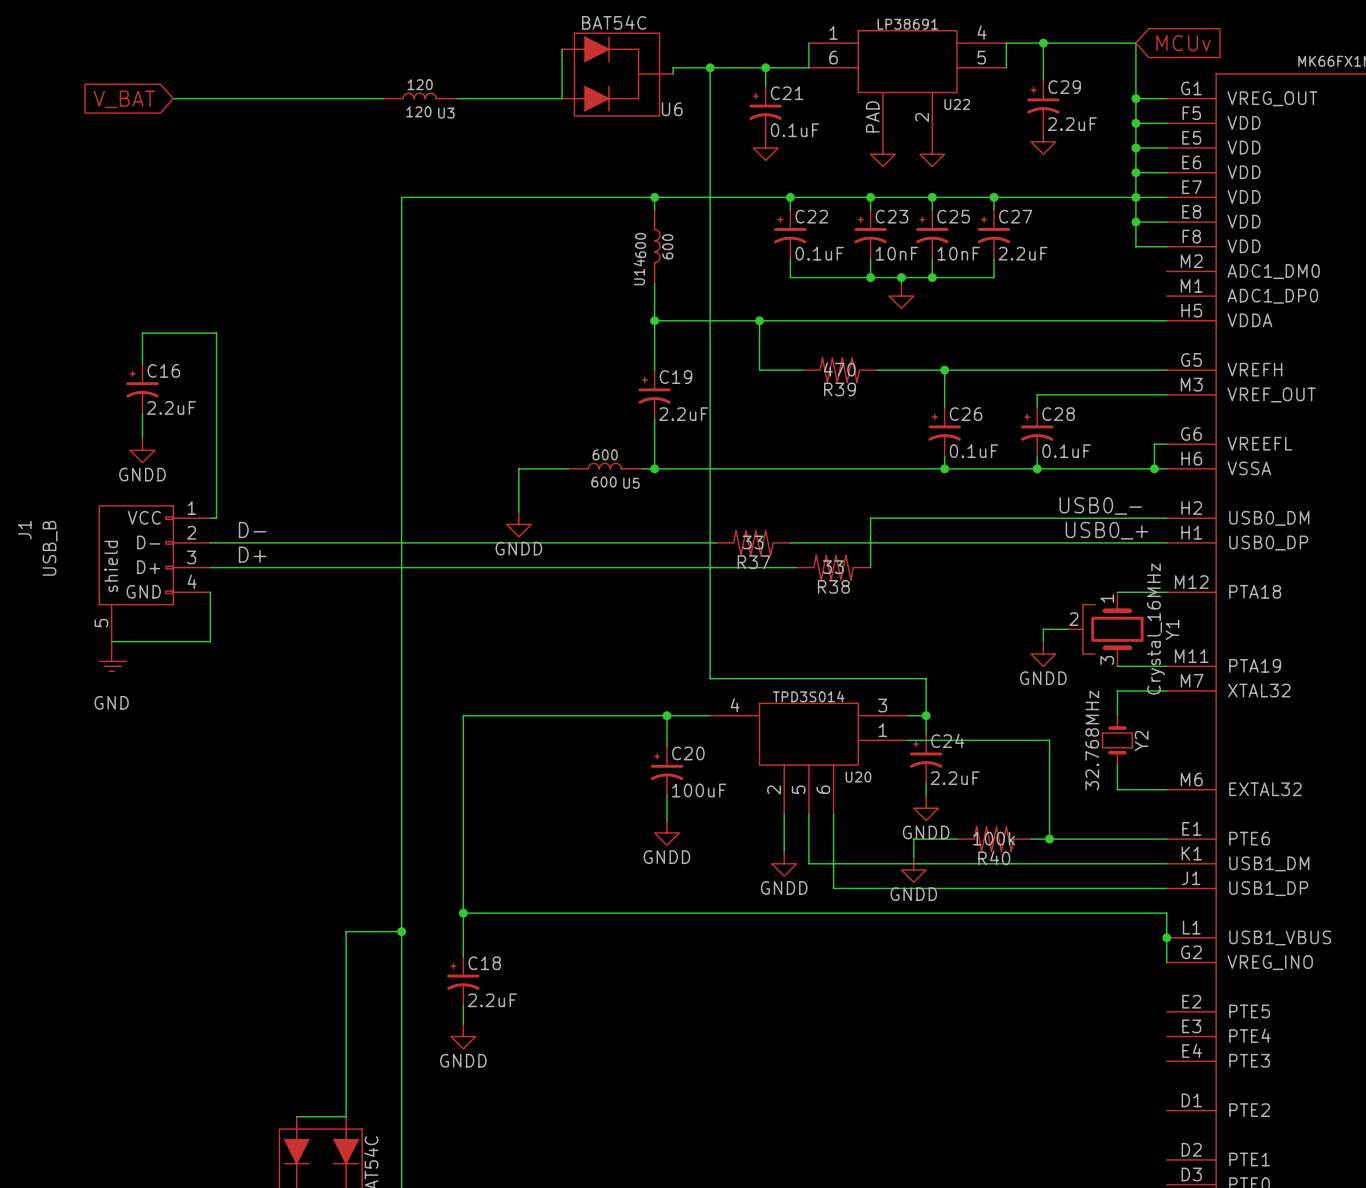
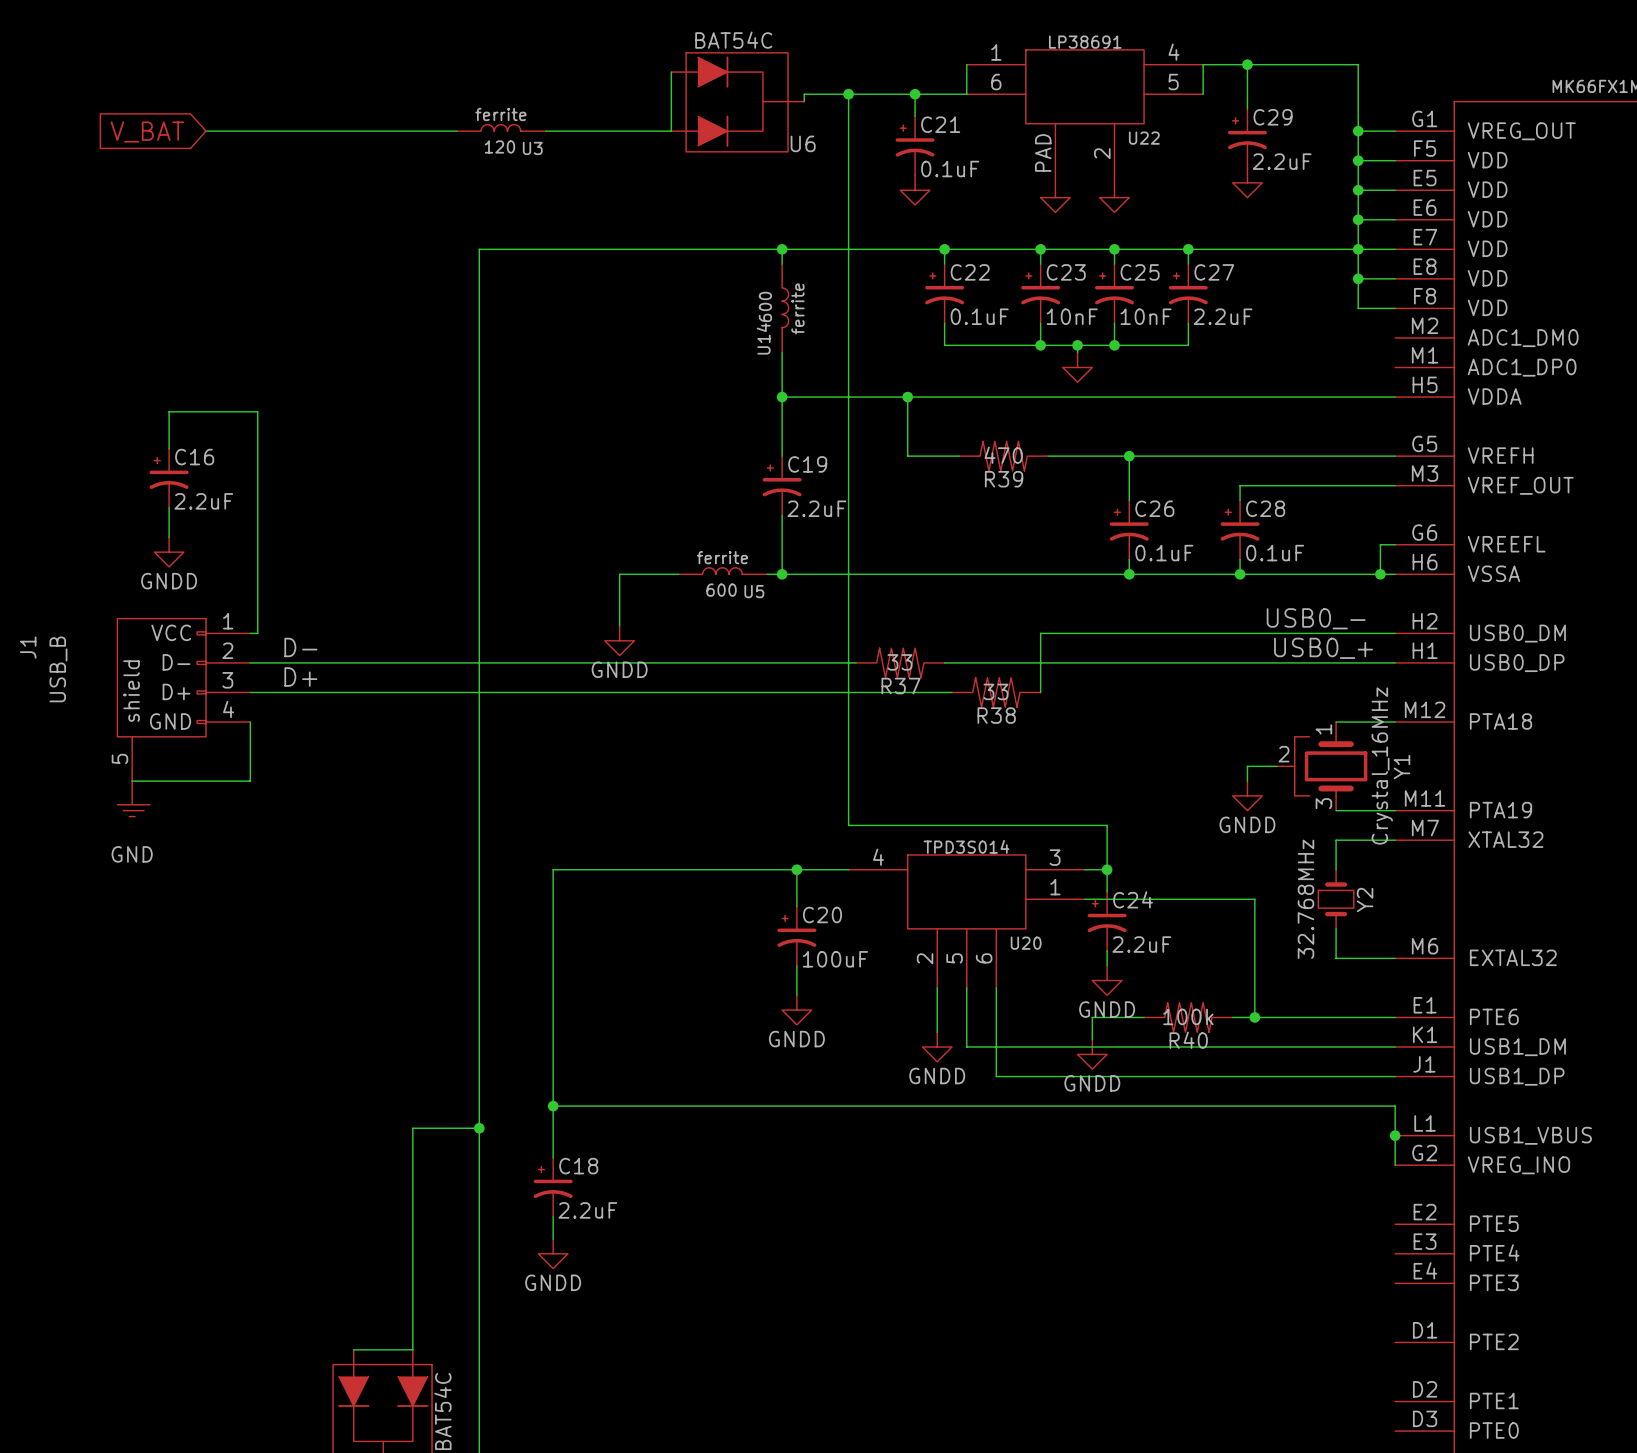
global label: MCUv (1183, 43) -> none
U3 value: 120 (420, 84) -> ferrite (500, 114)
U14 value: 600 (667, 246) -> ferrite (797, 308)
U5 value: 600 (605, 454) -> ferrite (722, 557)

